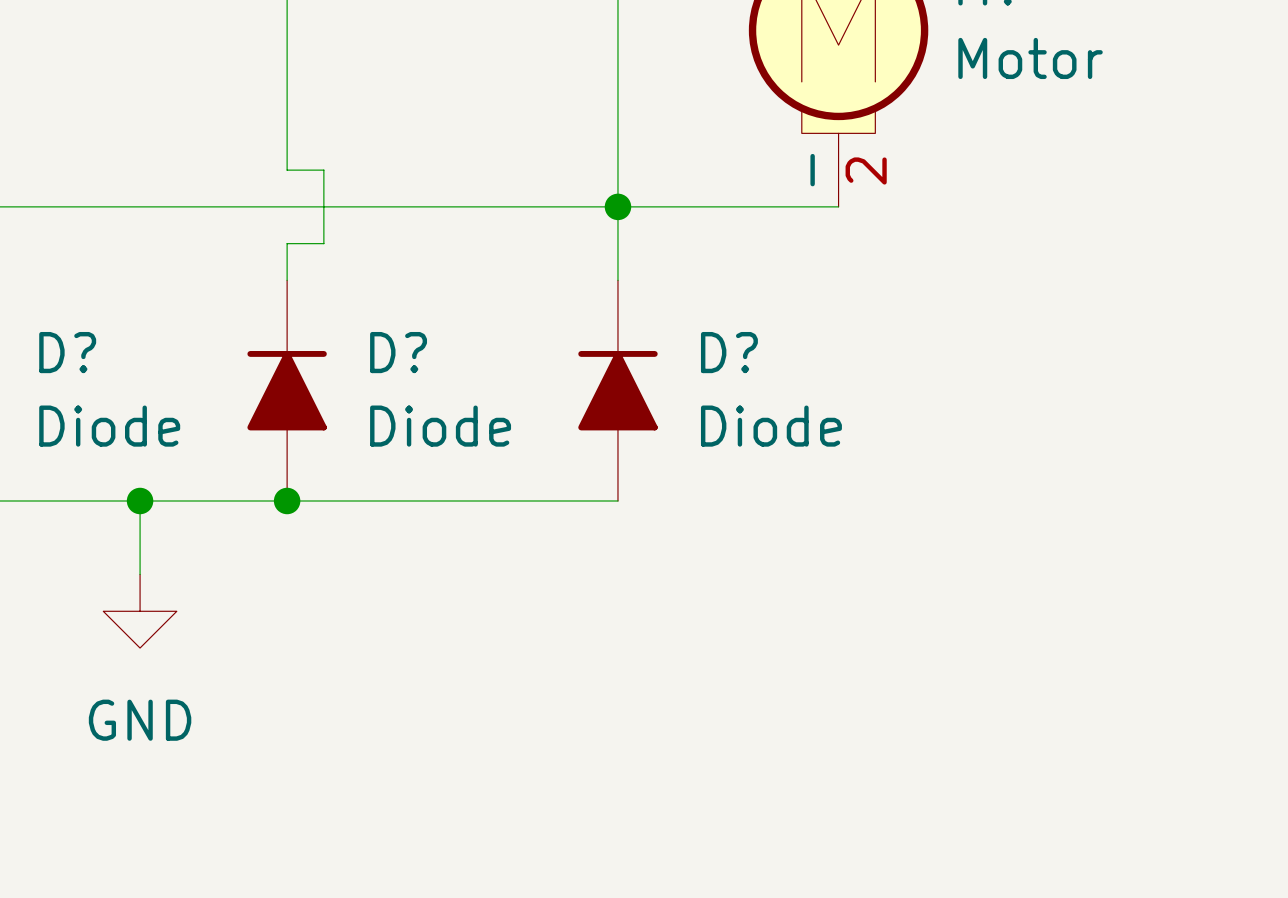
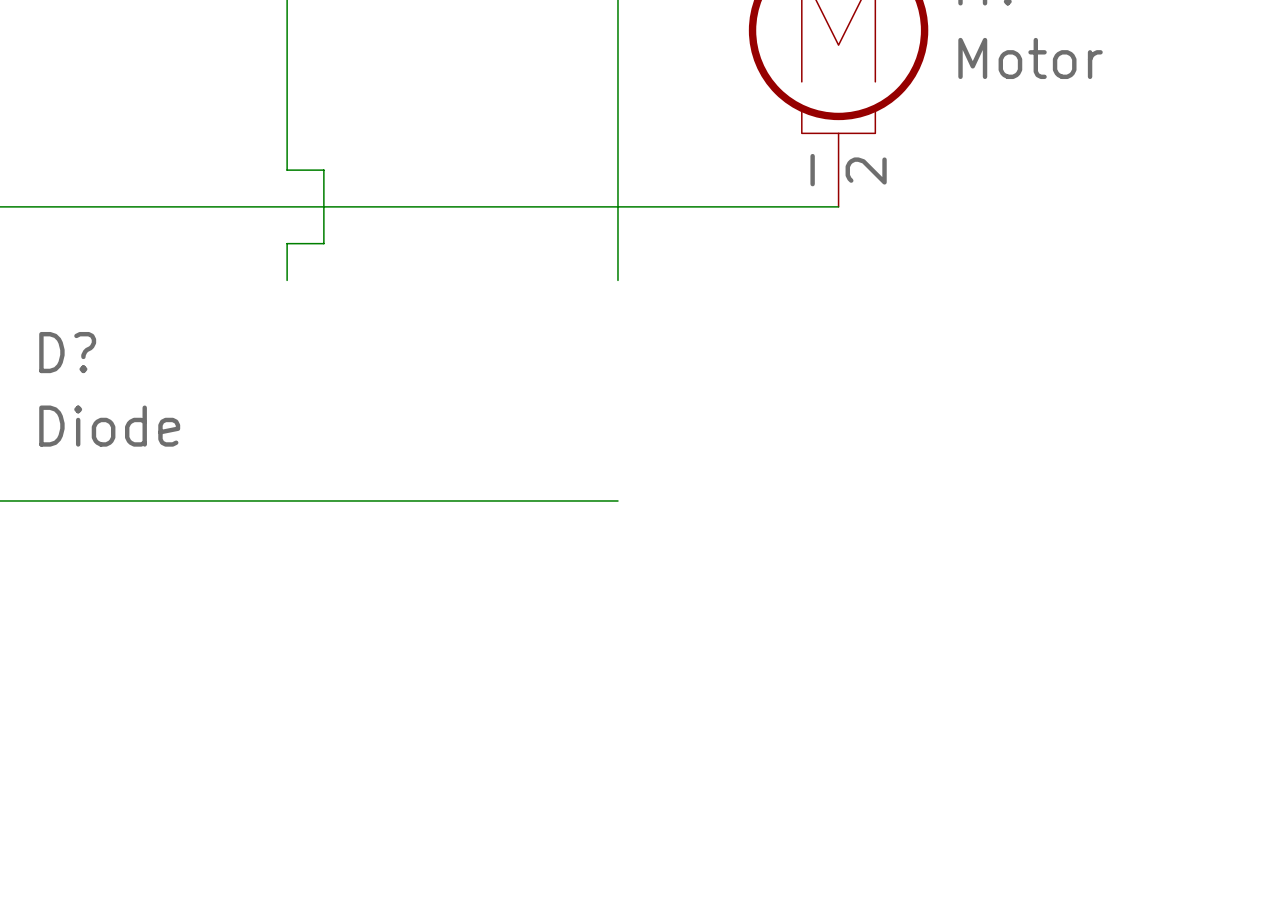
junction: (617, 206) -> none
D?: Diode (287, 390) -> none
D?: Diode (617, 390) -> none
wire: (140, 500) (140, 574) -> none
junction: (140, 500) -> none
junction: (287, 500) -> none
power symbol: GND (140, 611) -> none

